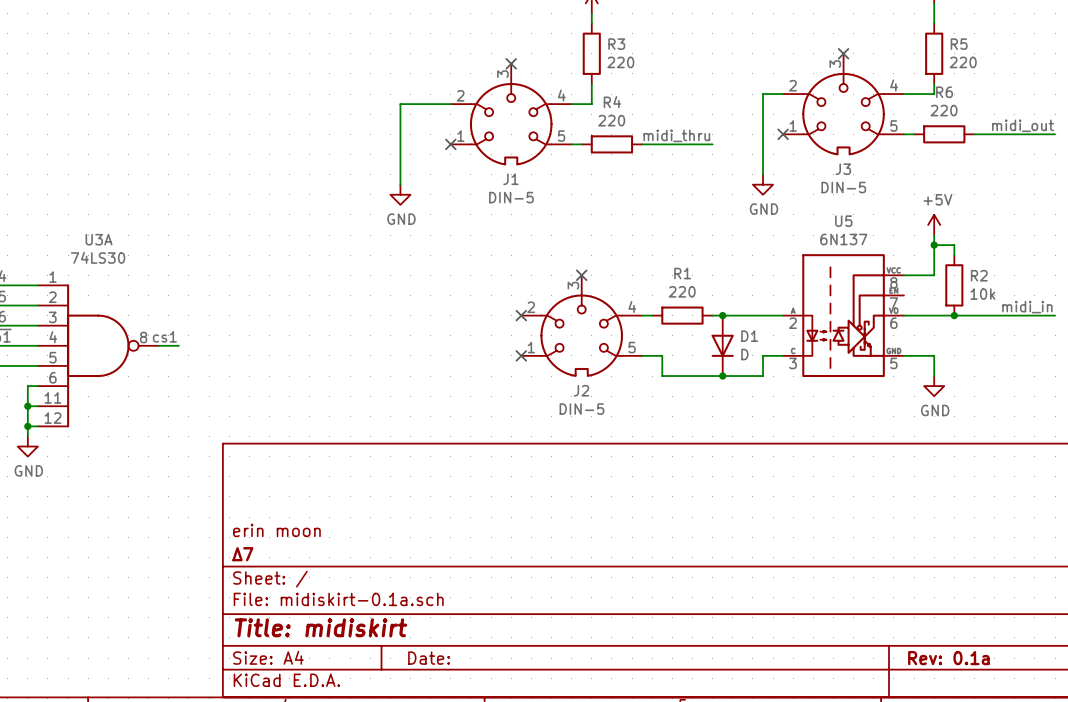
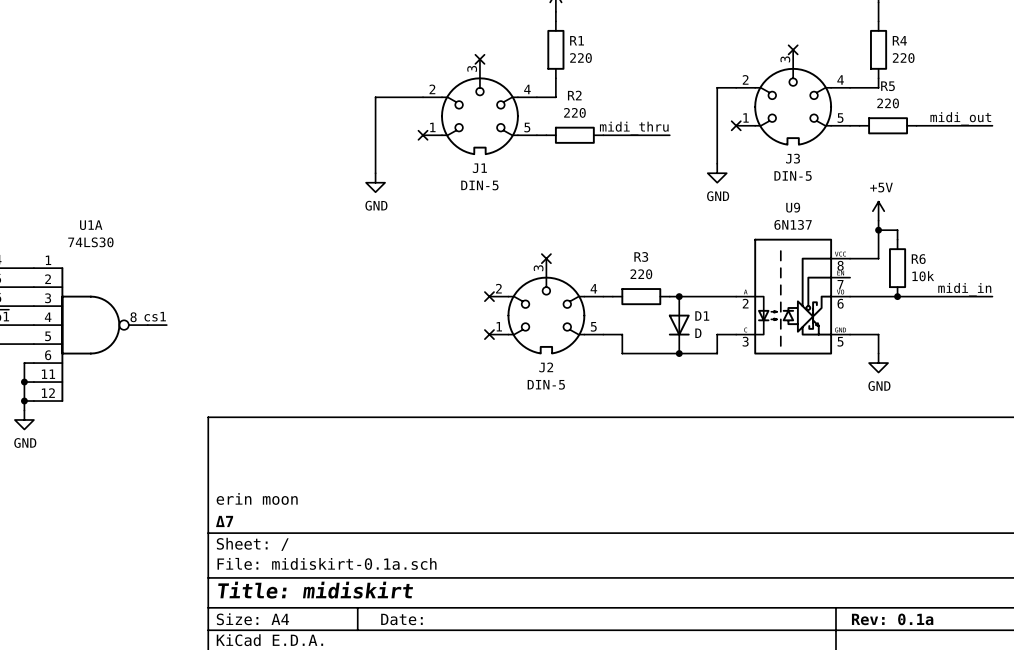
R3 name: R3 (616, 44) -> R1 (577, 40)
R5 name: R5 (959, 44) -> R4 (899, 40)
R6 name: R6 (944, 92) -> R5 (887, 86)
R4 name: R4 (612, 102) -> R2 (574, 95)
U5 name: U5 (843, 221) -> U9 (793, 207)
U3A name: U3A (99, 239) -> U1A (91, 225)
R1 name: R1 (682, 273) -> R3 (641, 256)
R2 name: R2 (979, 275) -> R6 (918, 259)

